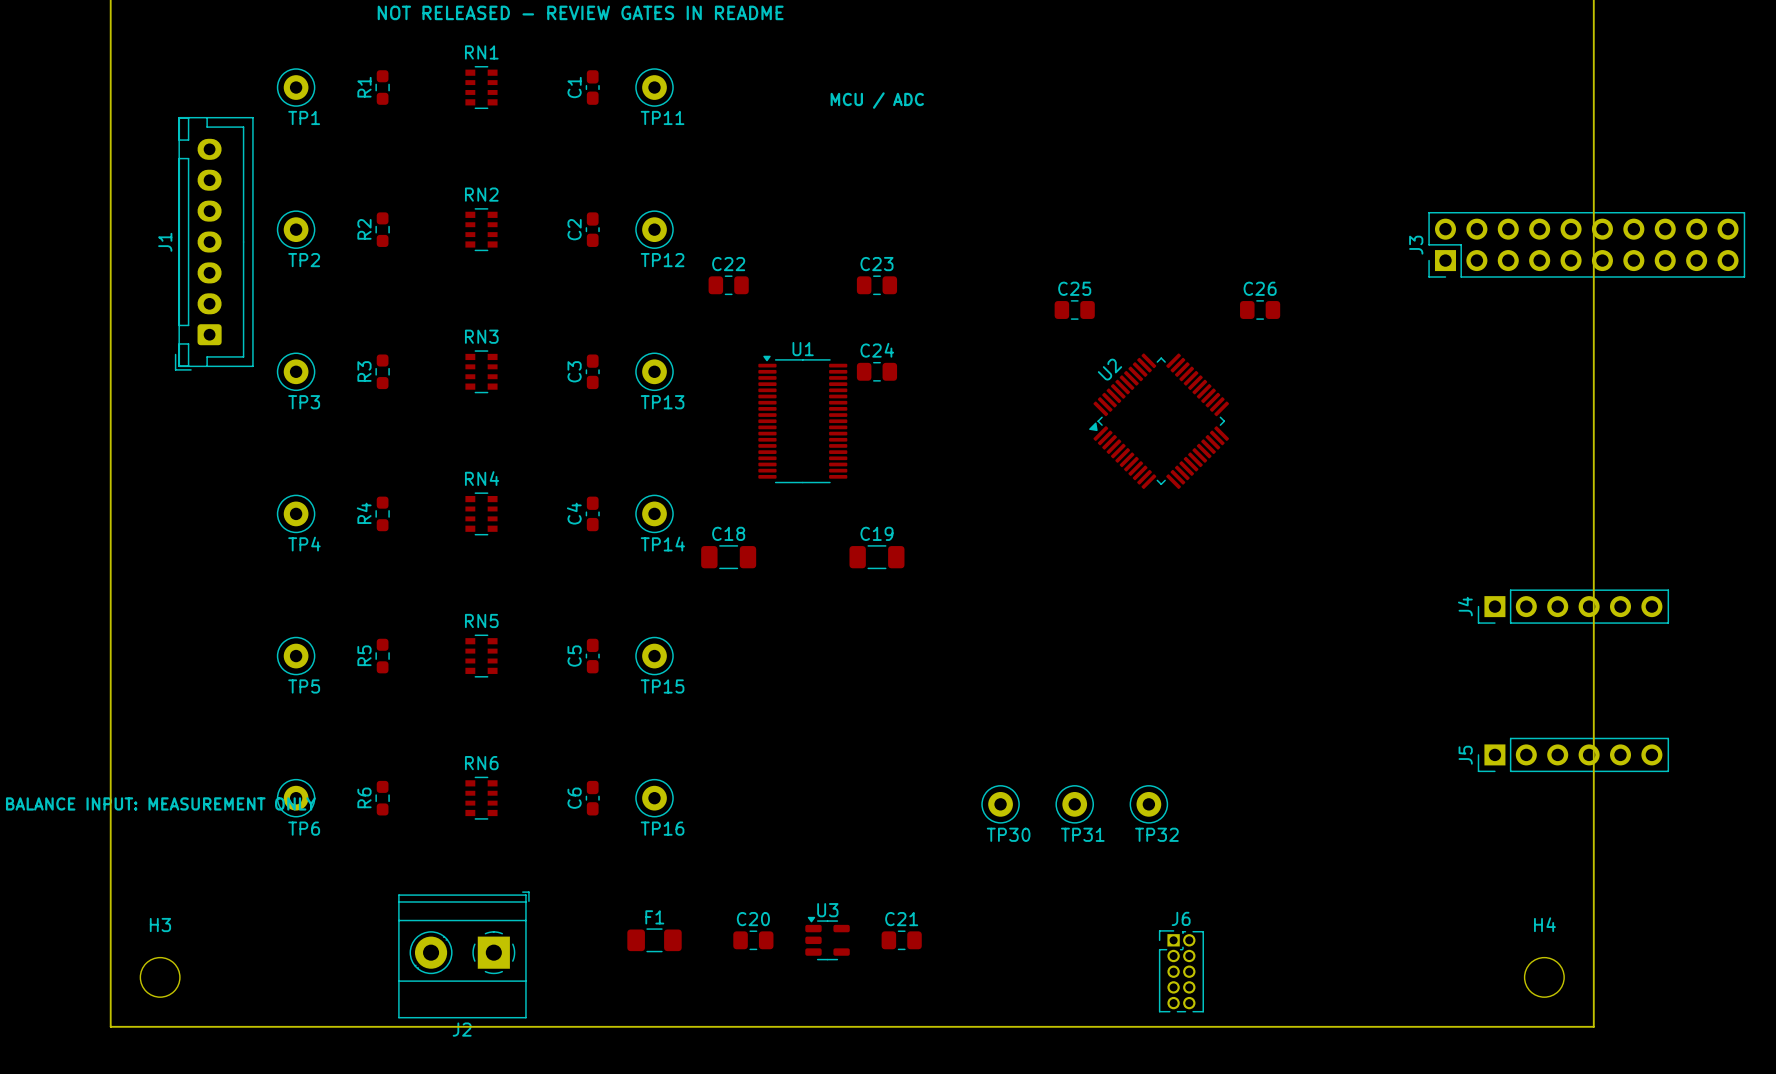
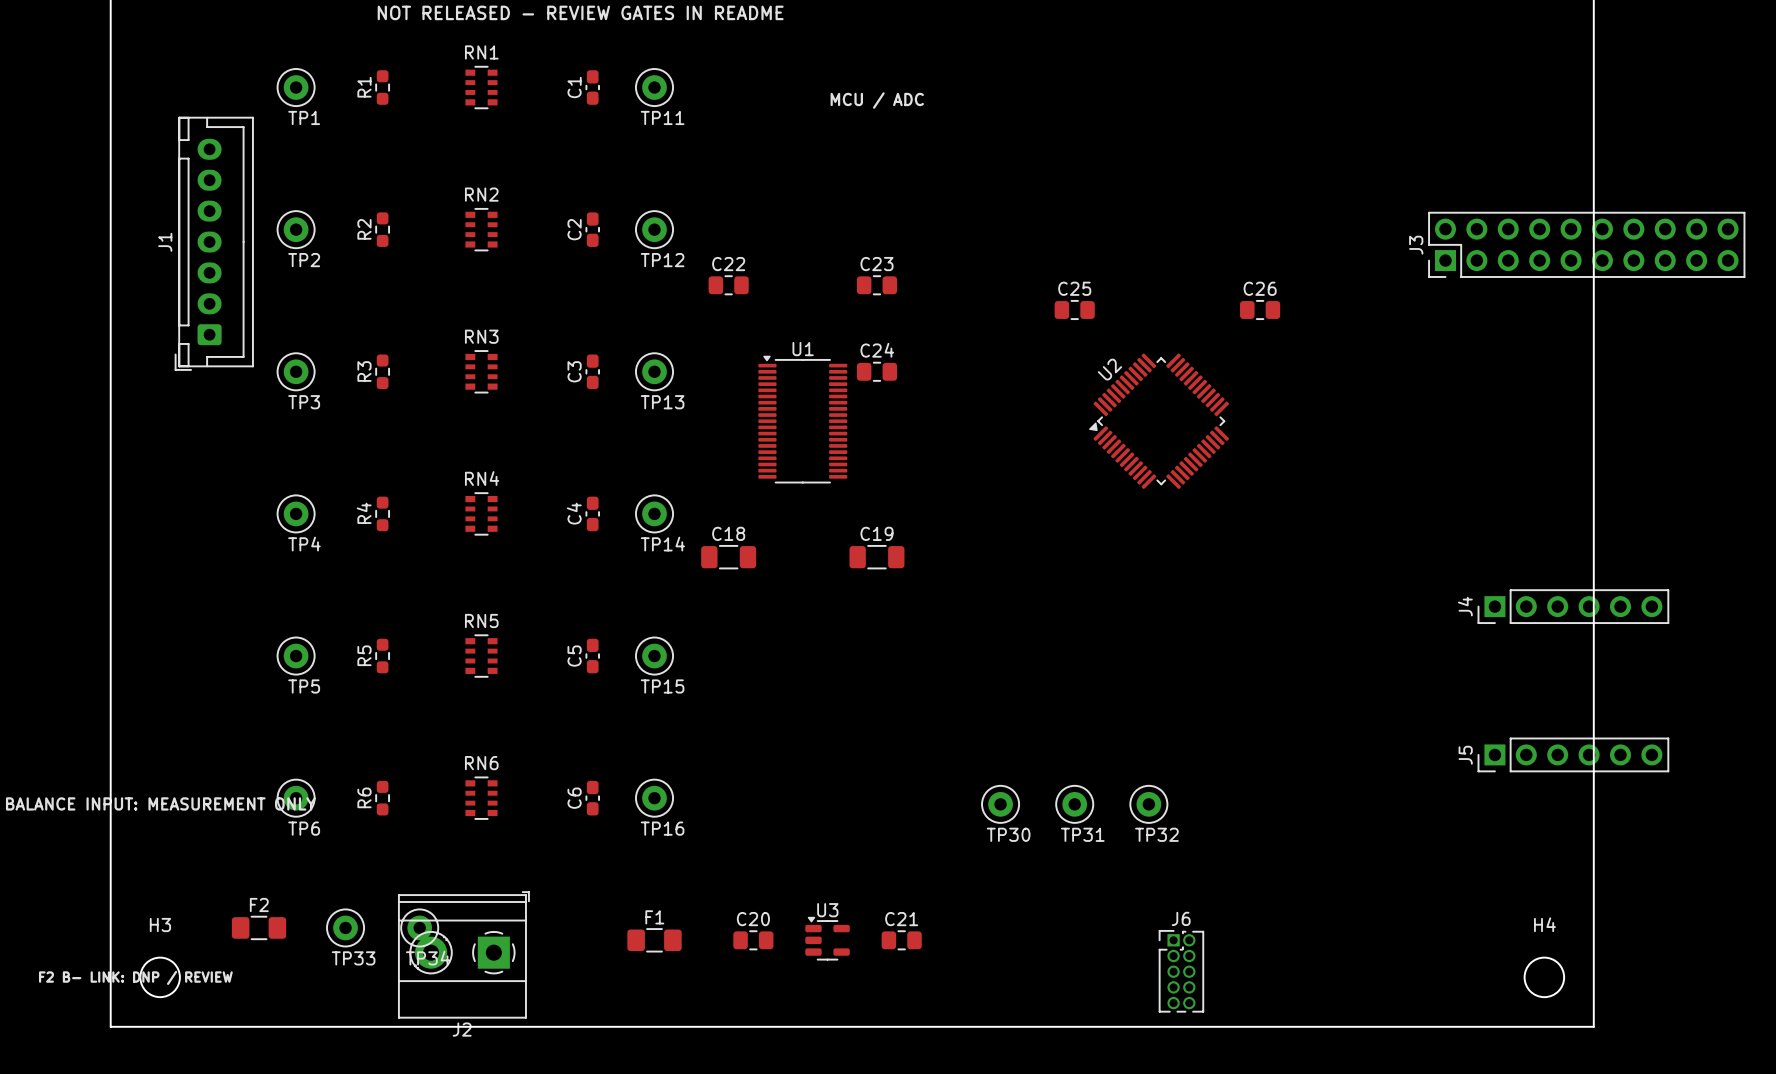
F2: none -> (259, 927)
TP33: none -> (345, 927)
TP34: none -> (419, 927)
text: none -> F2 B- LINK: DNP / REVIEW (135, 977)

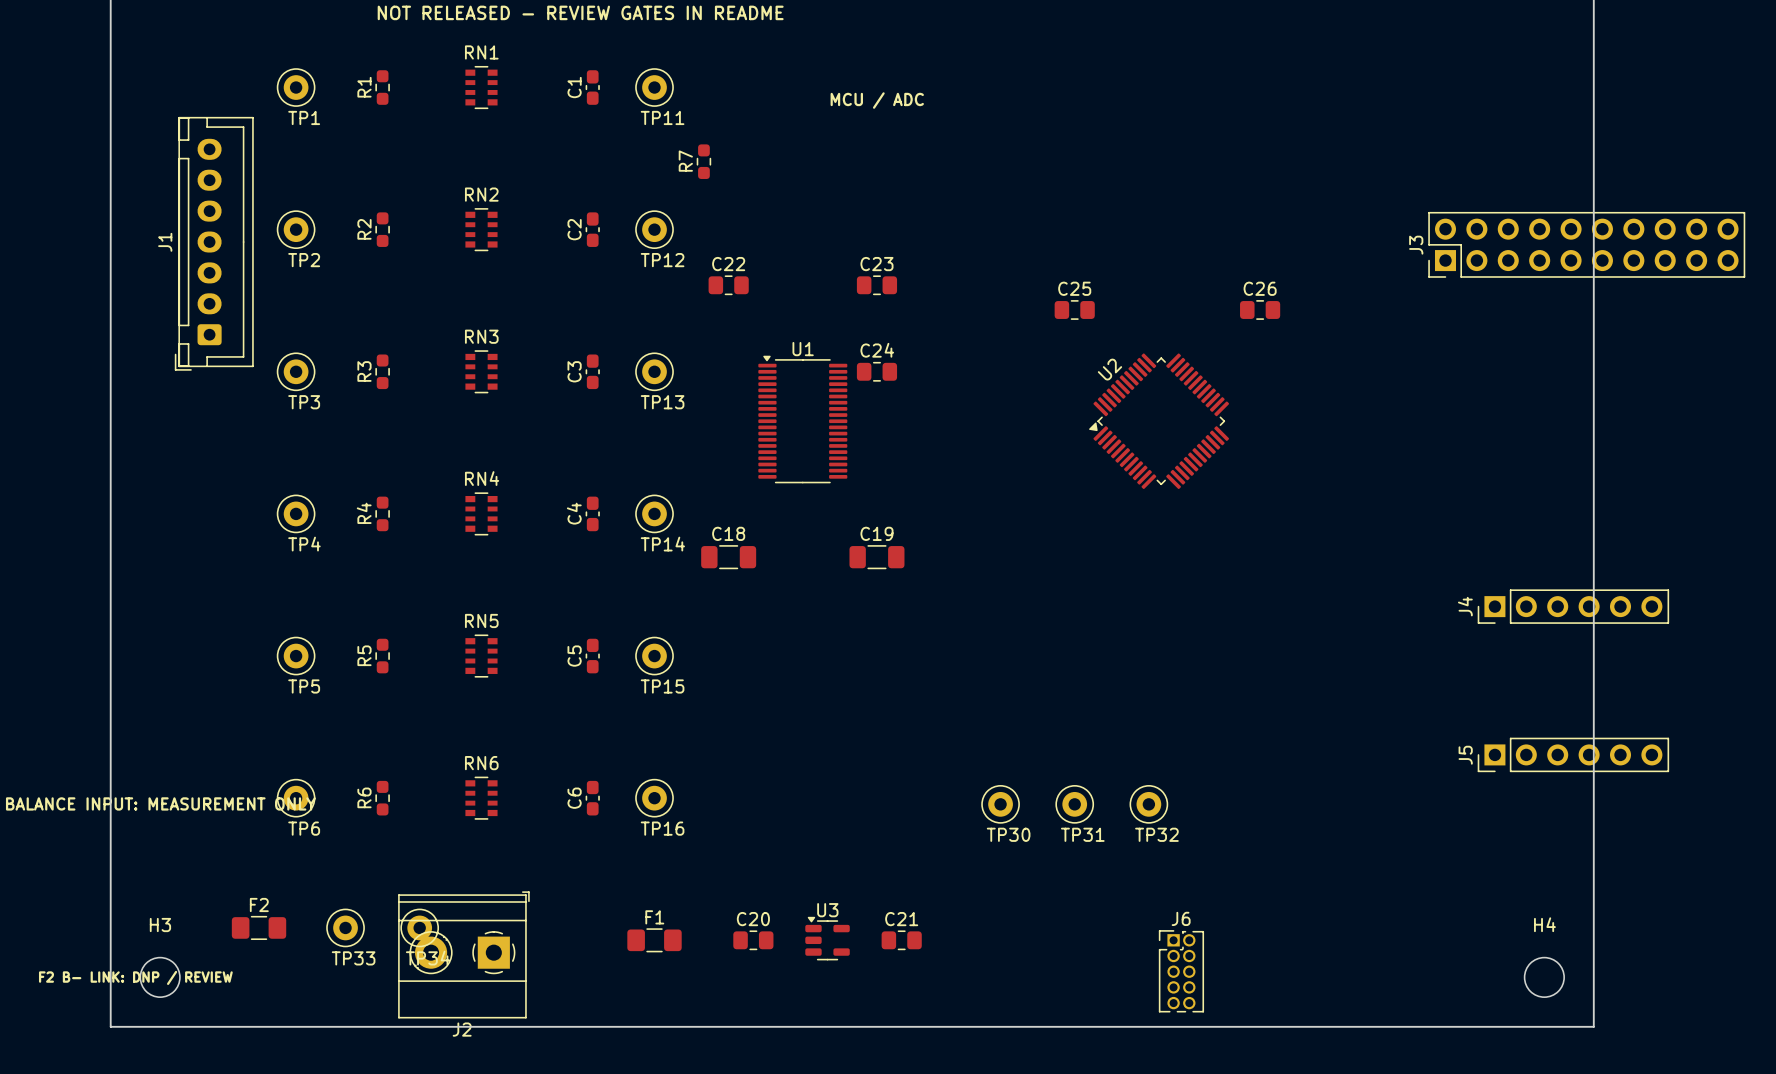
R7: none -> (703, 161)

